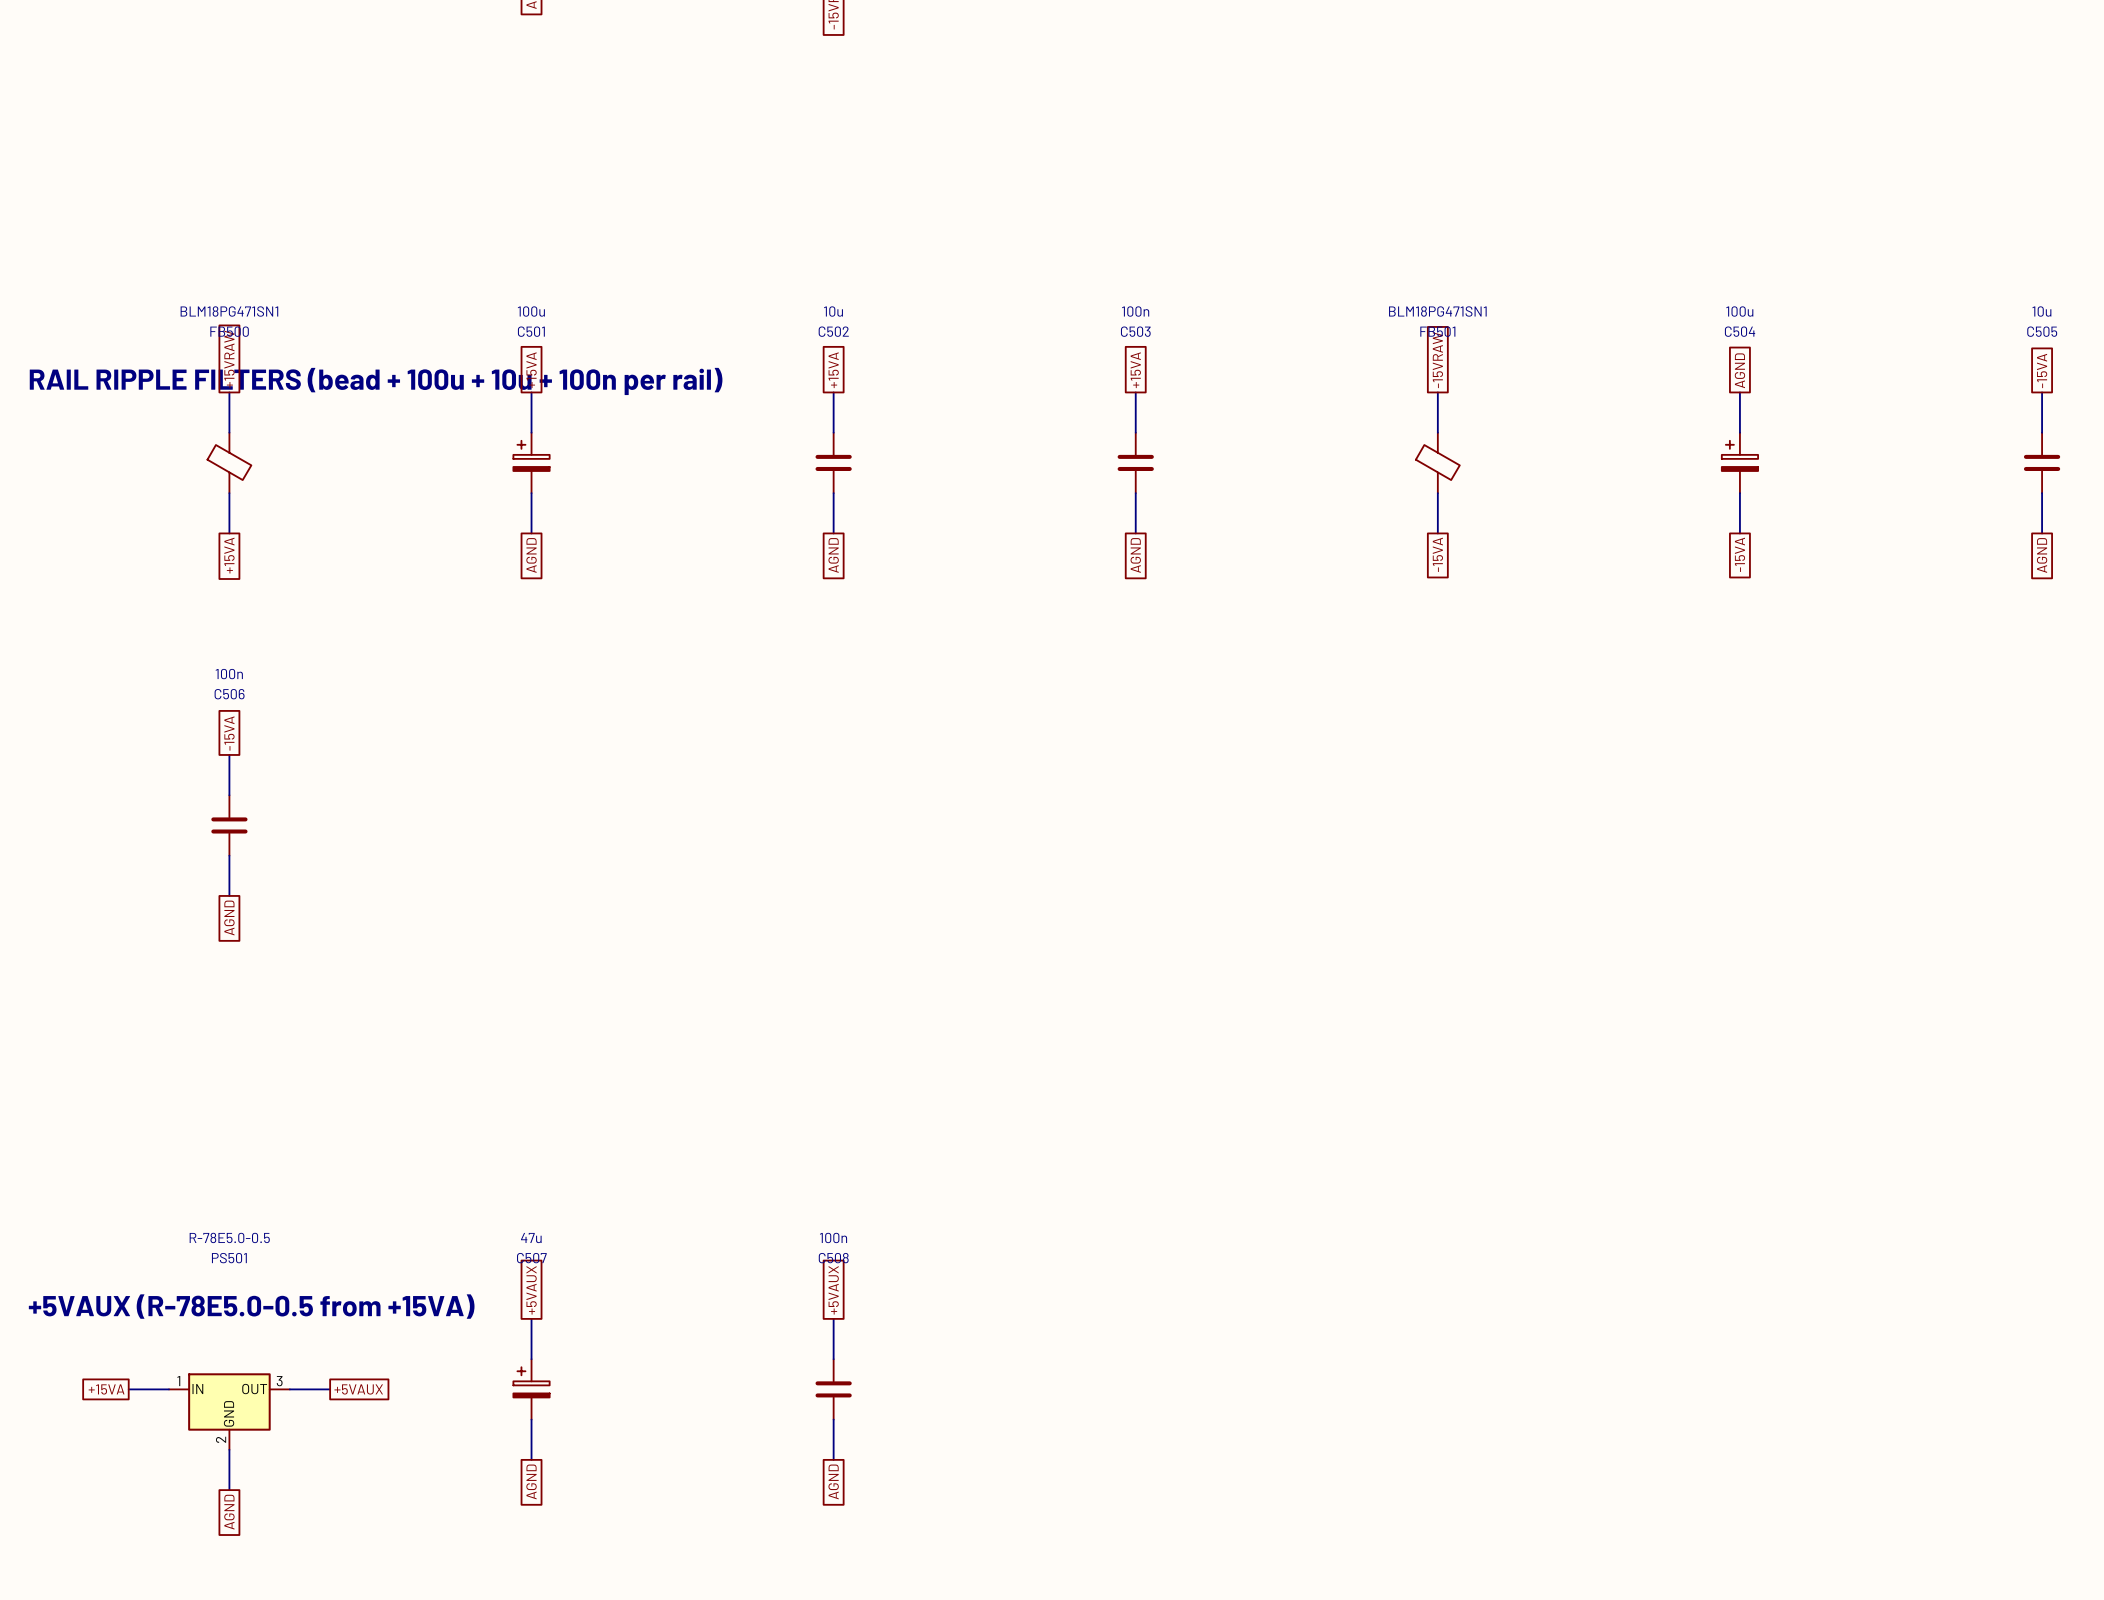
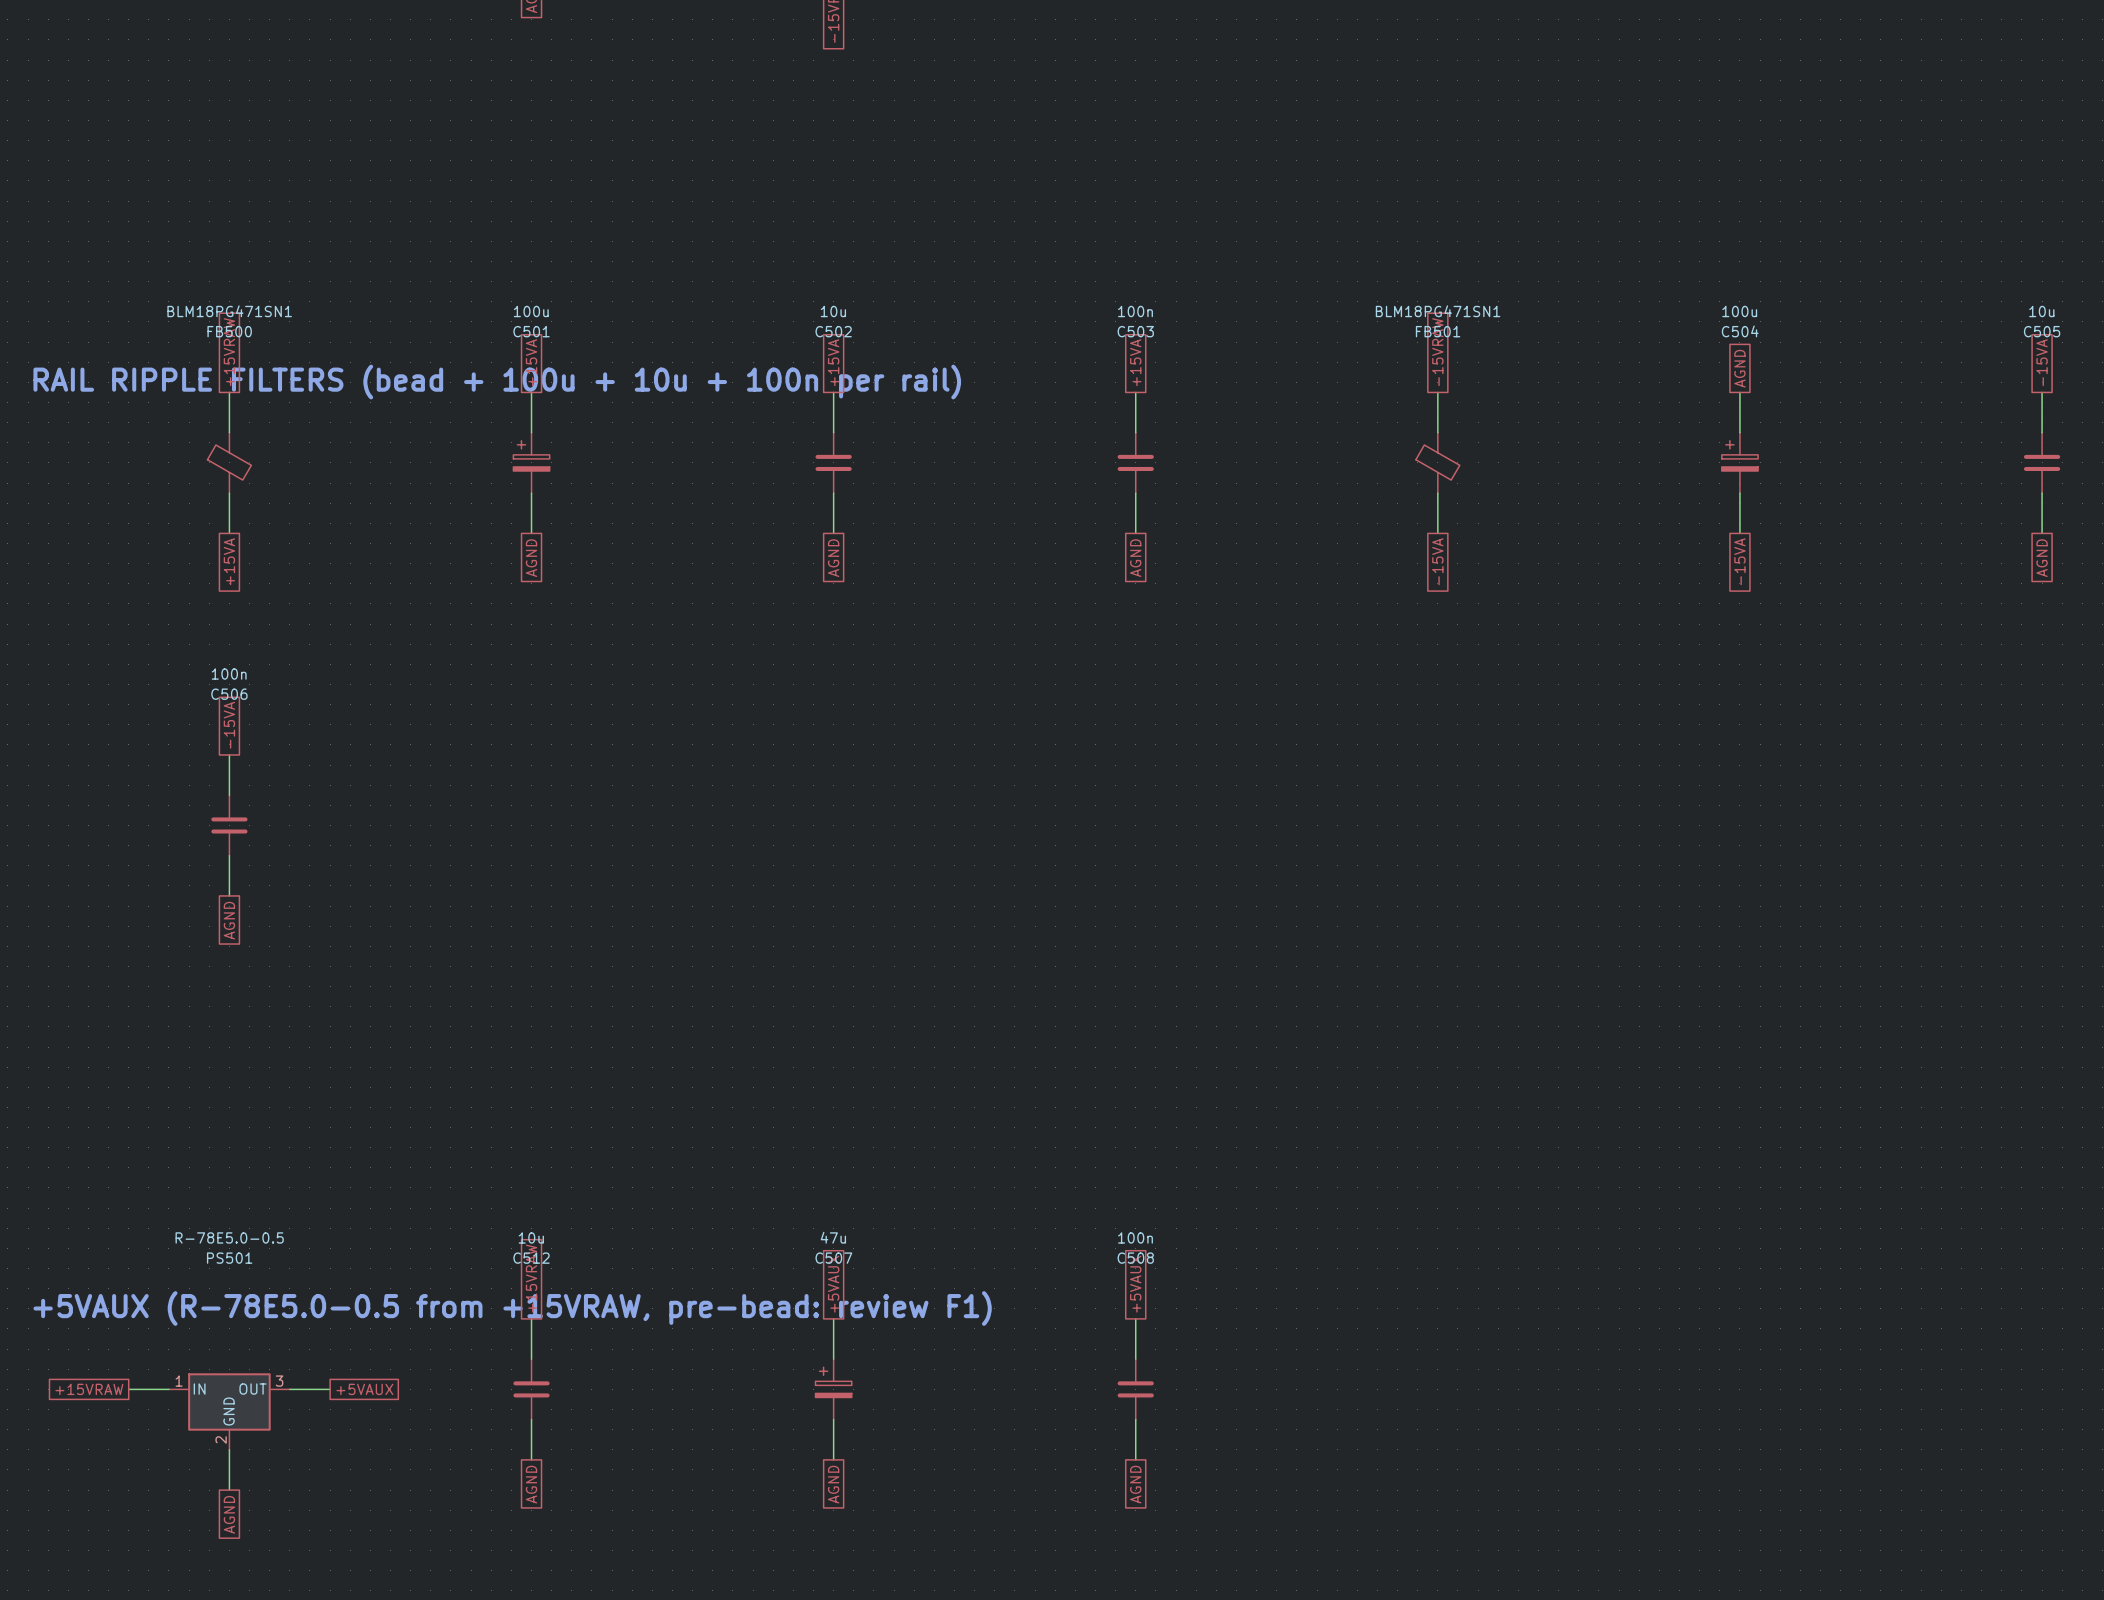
global label: +5VAUX (531, 1290) -> +15VRAW (531, 1278)
global label: none -> +5VAUX (1135, 1284)
text: +5VAUX (R-78E5.0-0.5 from +15VA) (251, 1306) -> +5VAUX (R-78E5.0-0.5 from +15VRAW, pre-bead: review F1) (512, 1308)
wire: none -> (1135, 1318) (1135, 1359)
global label: +15VA (106, 1389) -> +15VRAW (89, 1389)
C507 position: (531, 1389) -> (833, 1389)
C512: none -> 10u (531, 1389)
C508 position: (833, 1389) -> (1135, 1389)
wire: none -> (1135, 1419) (1135, 1459)
global label: none -> AGND (1135, 1484)

